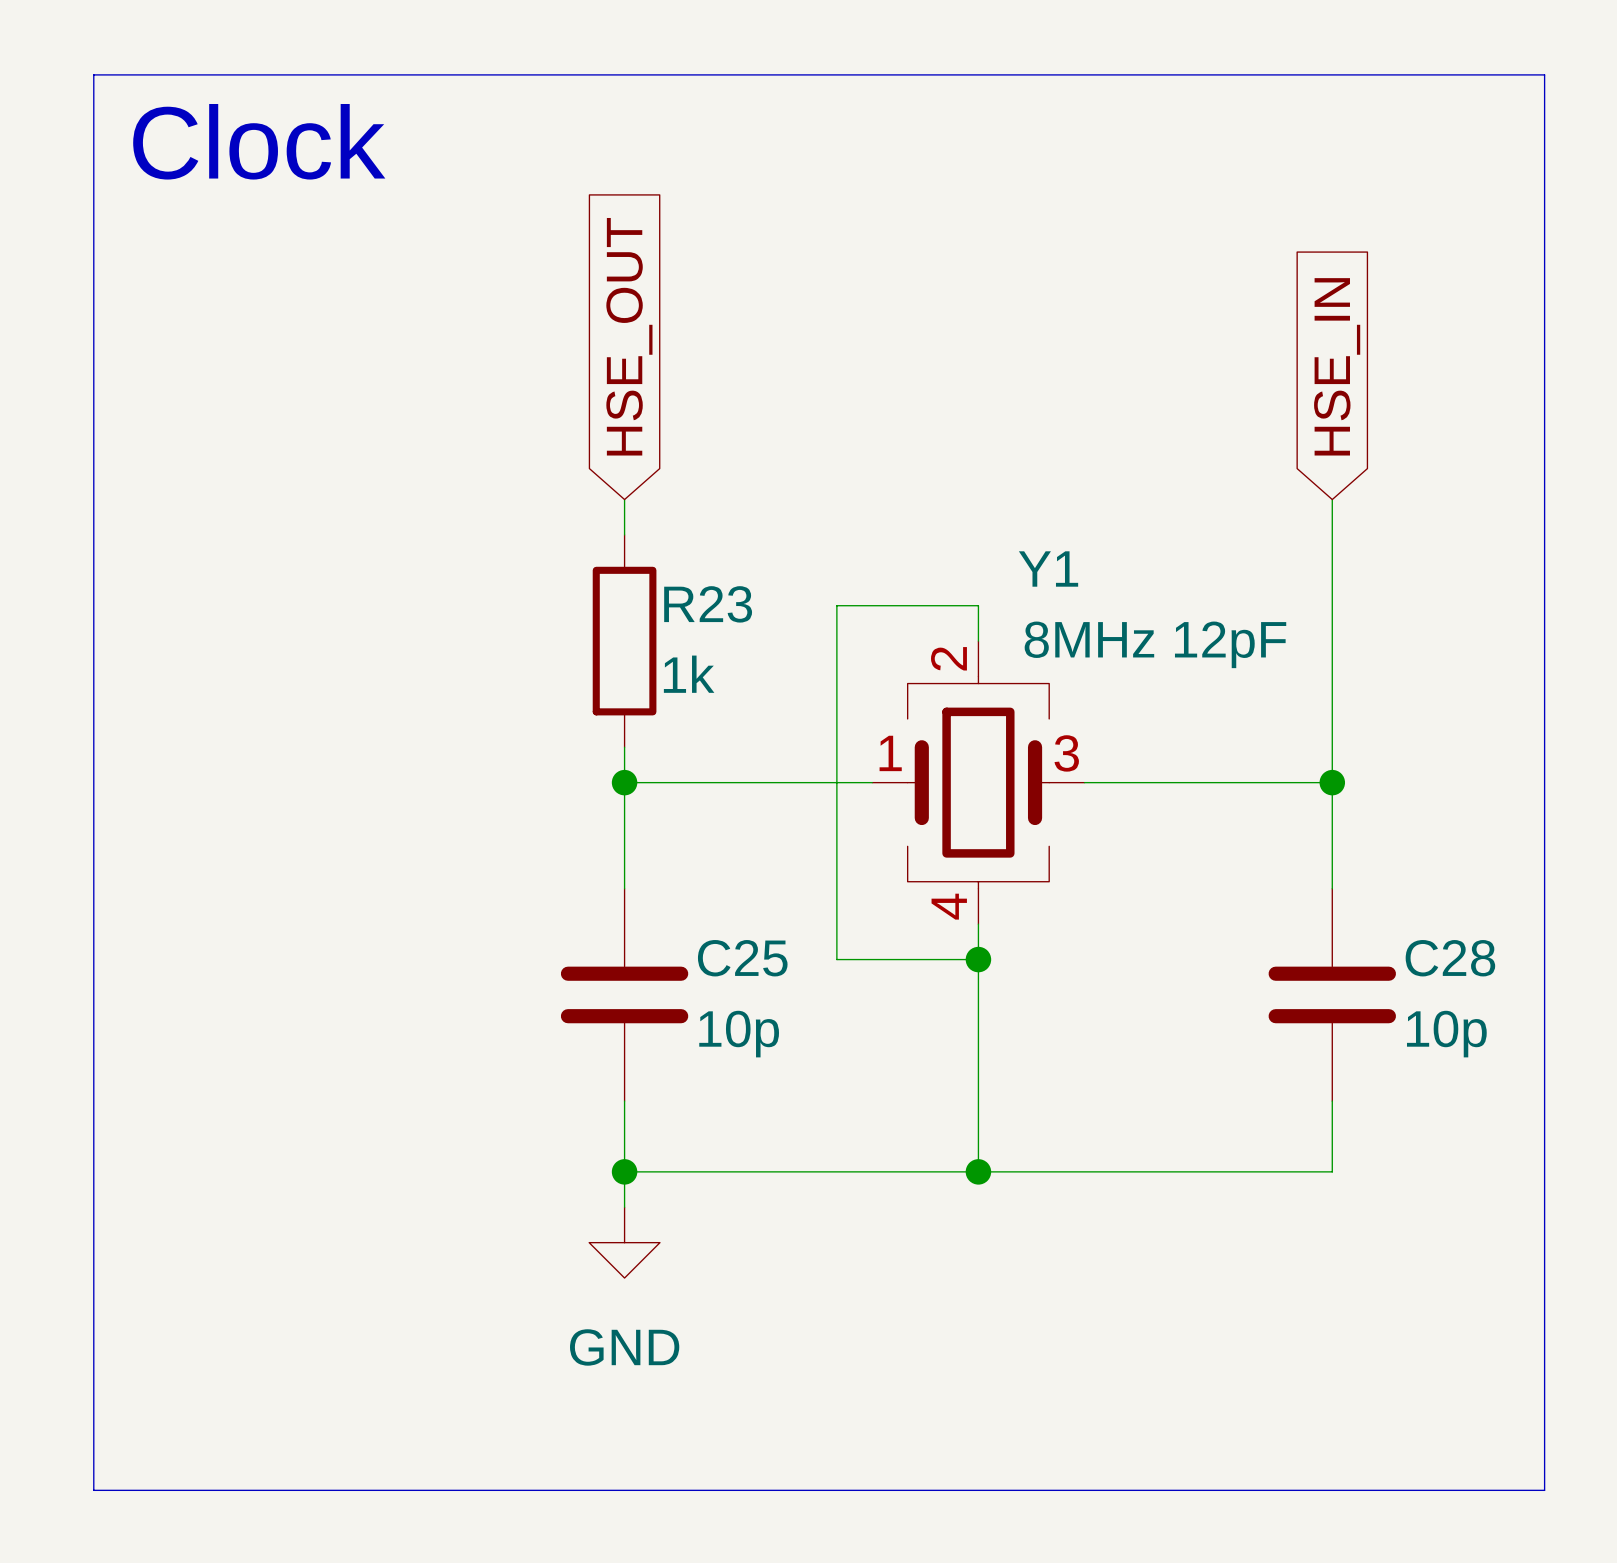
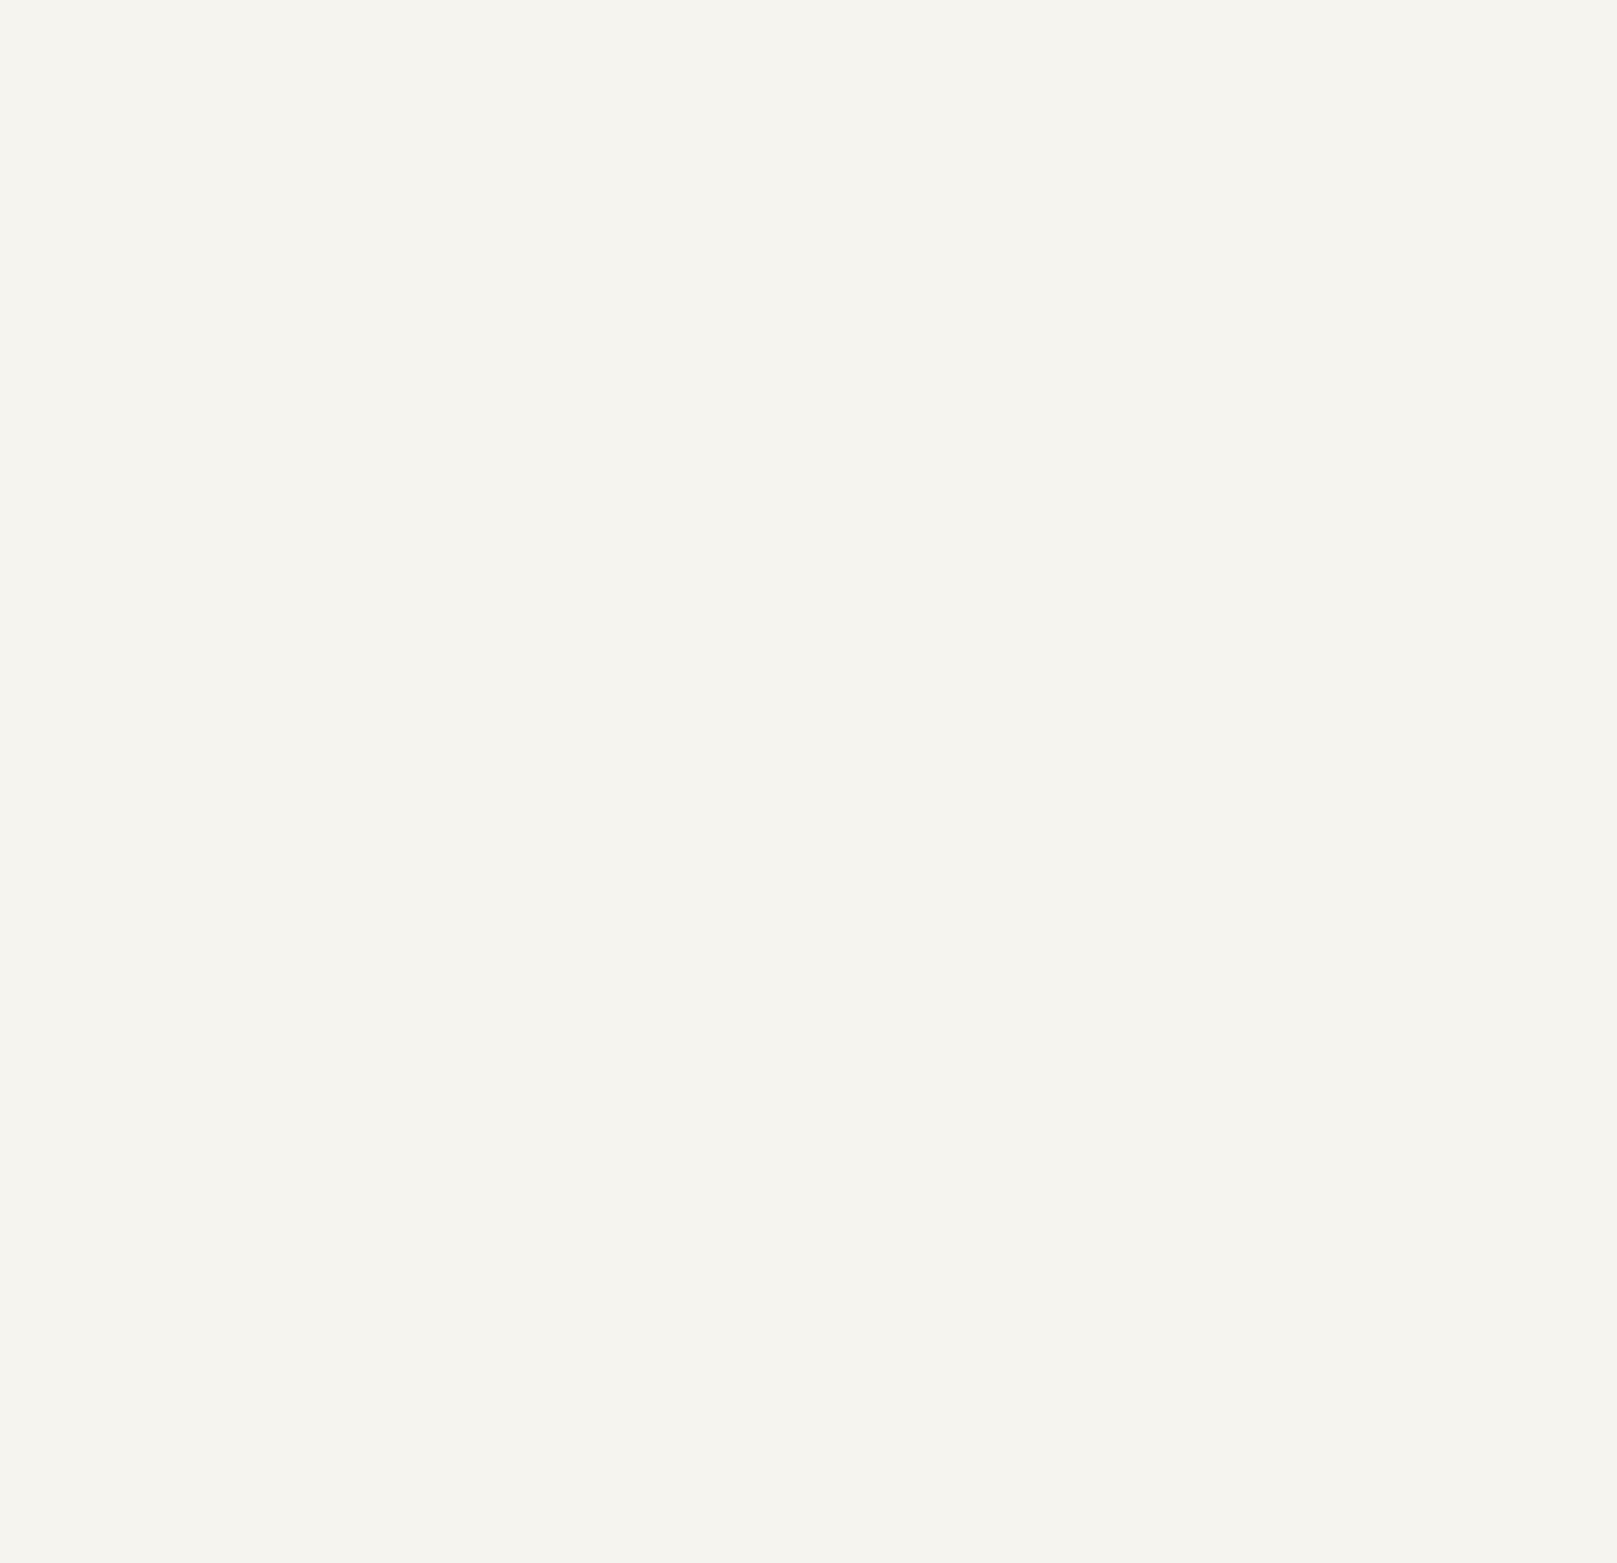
line: (93, 74) (1544, 74) (1544, 1490) (93, 1490) (93, 74) -> none
text: Clock (259, 141) -> none
global label: HSE_OUT (629, 336) -> none
global label: HSE_IN (1337, 366) -> none
wire: (624, 499) (624, 534) -> none
wire: (1332, 499) (1332, 888) -> none
R23: 1k (624, 641) -> none
wire: (978, 641) (978, 605) (836, 605) (836, 959) (978, 959) -> none
wire: (624, 747) (624, 888) -> none
wire: (624, 782) (872, 782) -> none
junction: (624, 782) -> none
Y1: 8MHz 12pF (978, 782) -> none
wire: (1084, 782) (1332, 782) -> none
junction: (1332, 782) -> none
wire: (978, 924) (978, 1171) -> none
junction: (978, 959) -> none
C25: 10p (624, 994) -> none
C28: 10p (1332, 994) -> none
wire: (624, 1101) (624, 1207) -> none
wire: (1332, 1101) (1332, 1171) (624, 1171) -> none
junction: (624, 1171) -> none
junction: (978, 1171) -> none
power symbol: GND (624, 1242) -> none

